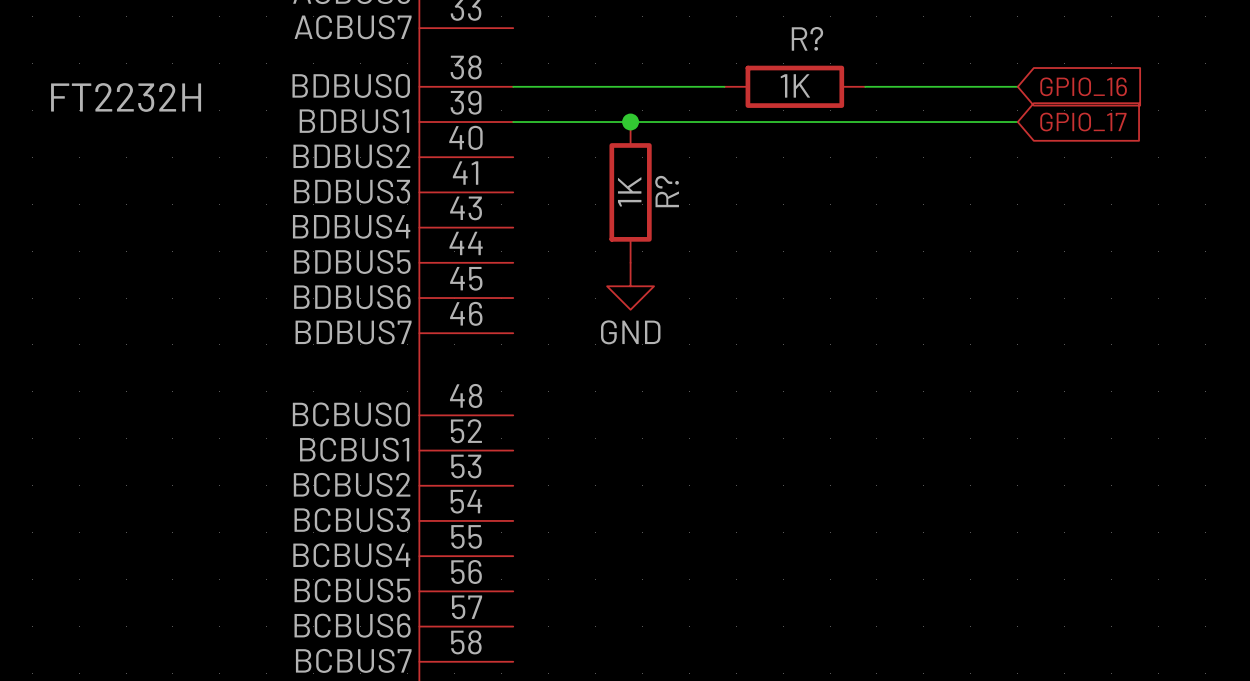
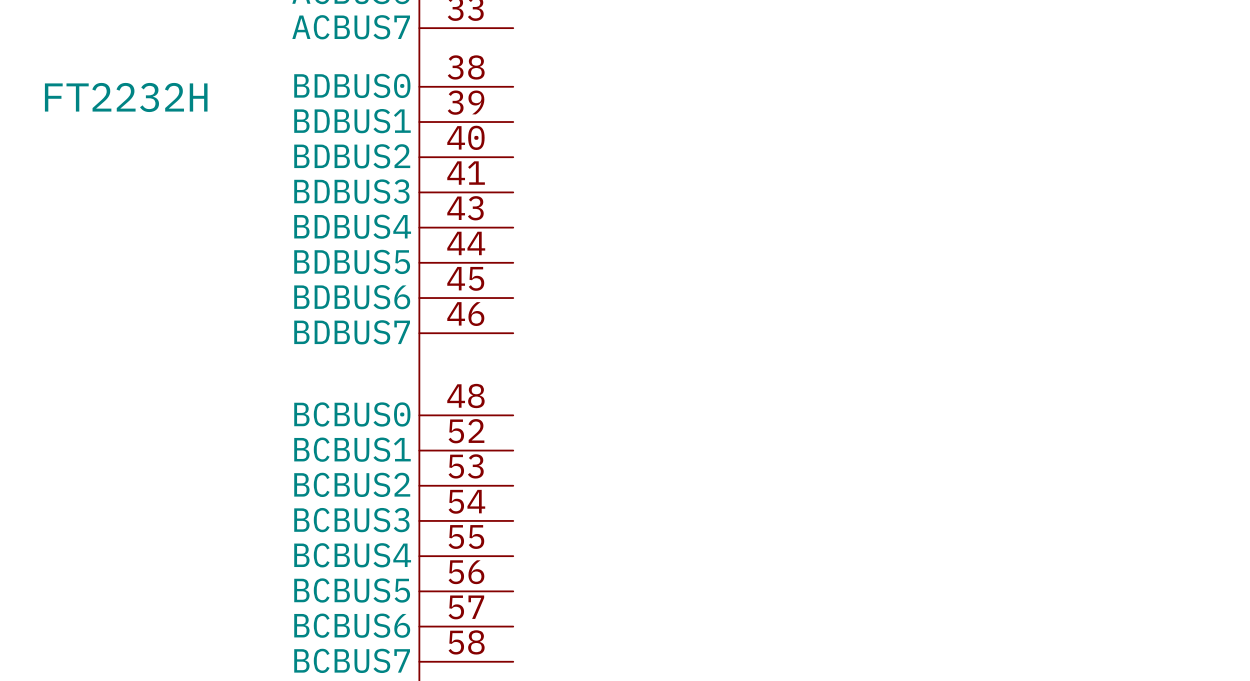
wire: (513, 86) (724, 86) -> none
R?: 1K (794, 86) -> none
wire: (865, 86) (1017, 86) -> none
global label: GPIO_16 (1083, 86) -> none
wire: (513, 122) (1017, 122) -> none
junction: (630, 122) -> none
global label: GPIO_17 (1083, 122) -> none
R?: 1K (630, 192) -> none
power symbol: GND (630, 286) -> none

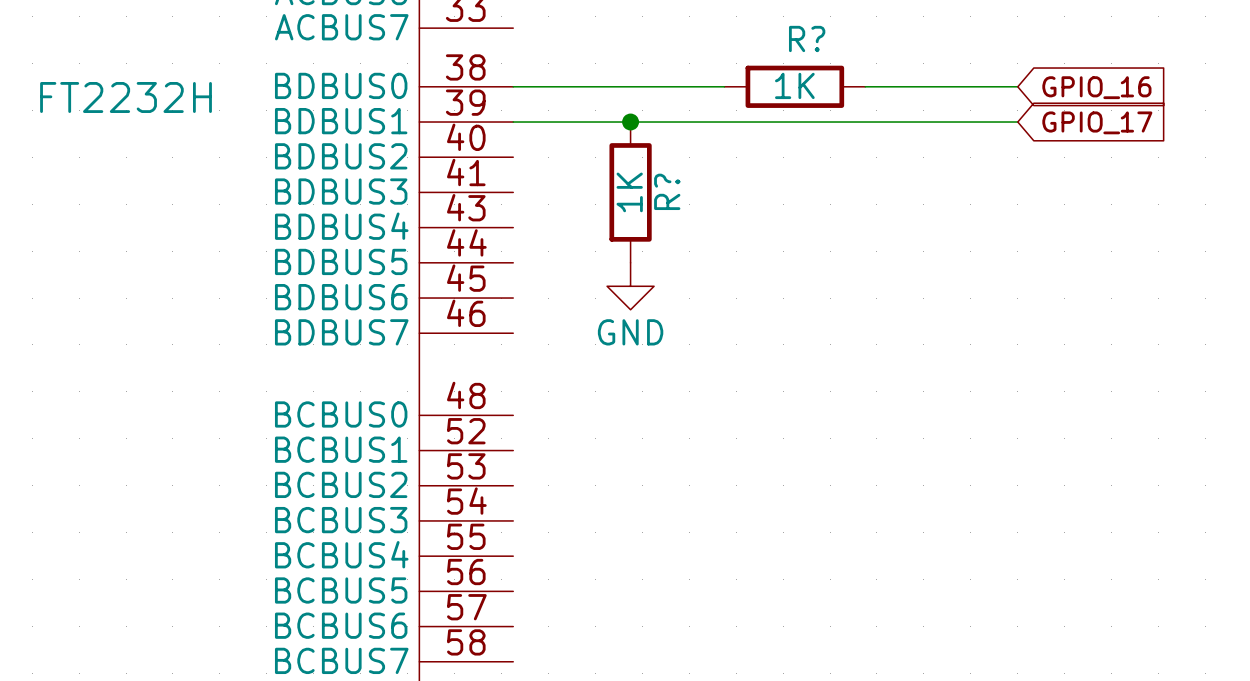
wire: none -> (513, 86) (724, 86)
R?: none -> 1K (794, 86)
wire: none -> (865, 86) (1017, 86)
global label: none -> GPIO_16 (1096, 87)
wire: none -> (513, 122) (1017, 122)
junction: none -> (630, 122)
global label: none -> GPIO_17 (1097, 122)
R?: none -> 1K (630, 192)
power symbol: none -> GND (630, 286)

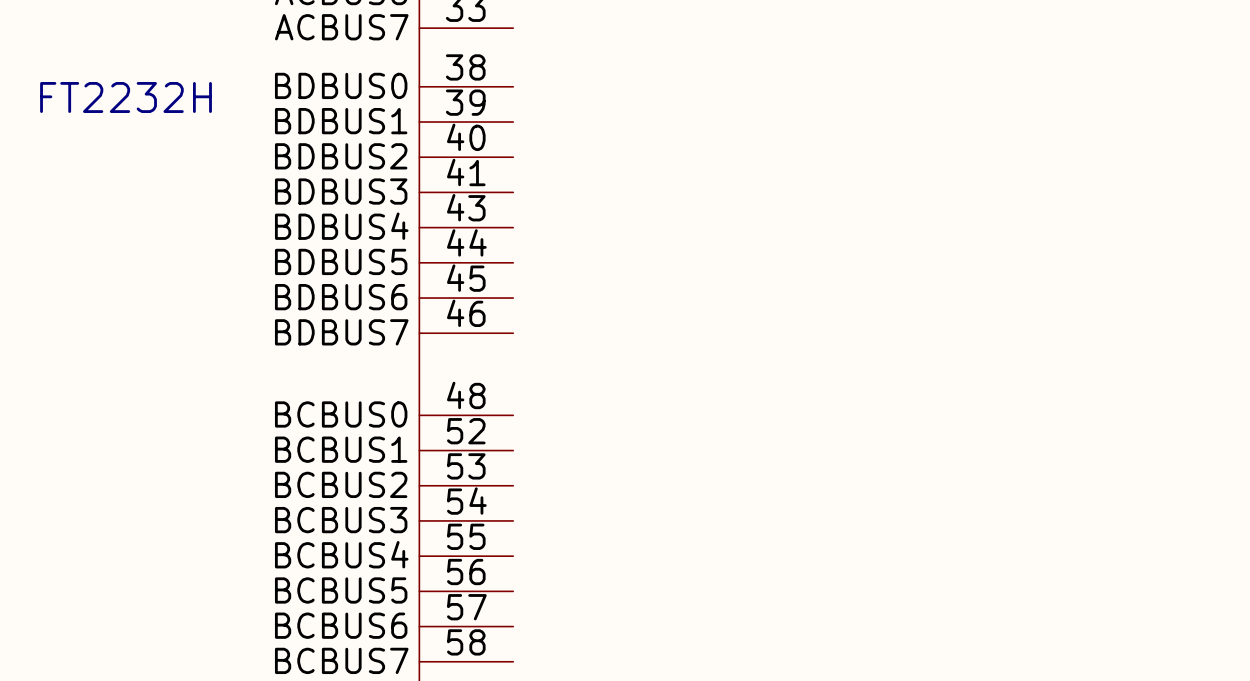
wire: (513, 86) (724, 86) -> none
R?: 1K (794, 86) -> none
wire: (865, 86) (1017, 86) -> none
global label: GPIO_16 (1096, 87) -> none
wire: (513, 122) (1017, 122) -> none
junction: (630, 122) -> none
global label: GPIO_17 (1097, 122) -> none
R?: 1K (630, 192) -> none
power symbol: GND (630, 286) -> none

